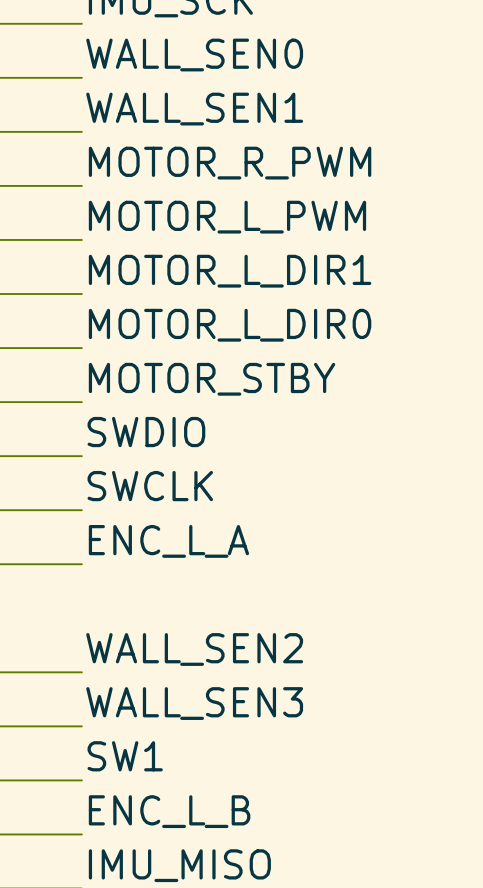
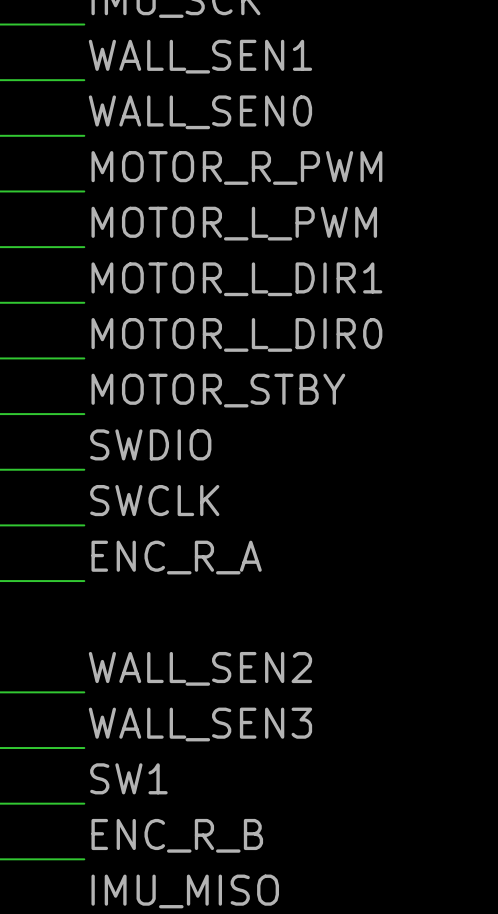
label: WALL_SEN0 (194, 55) -> WALL_SEN1 (200, 56)
label: WALL_SEN1 (194, 109) -> WALL_SEN0 (200, 112)
label: ENC_L_A (168, 541) -> ENC_R_A (176, 557)
label: ENC_L_B (169, 811) -> ENC_R_B (177, 835)

